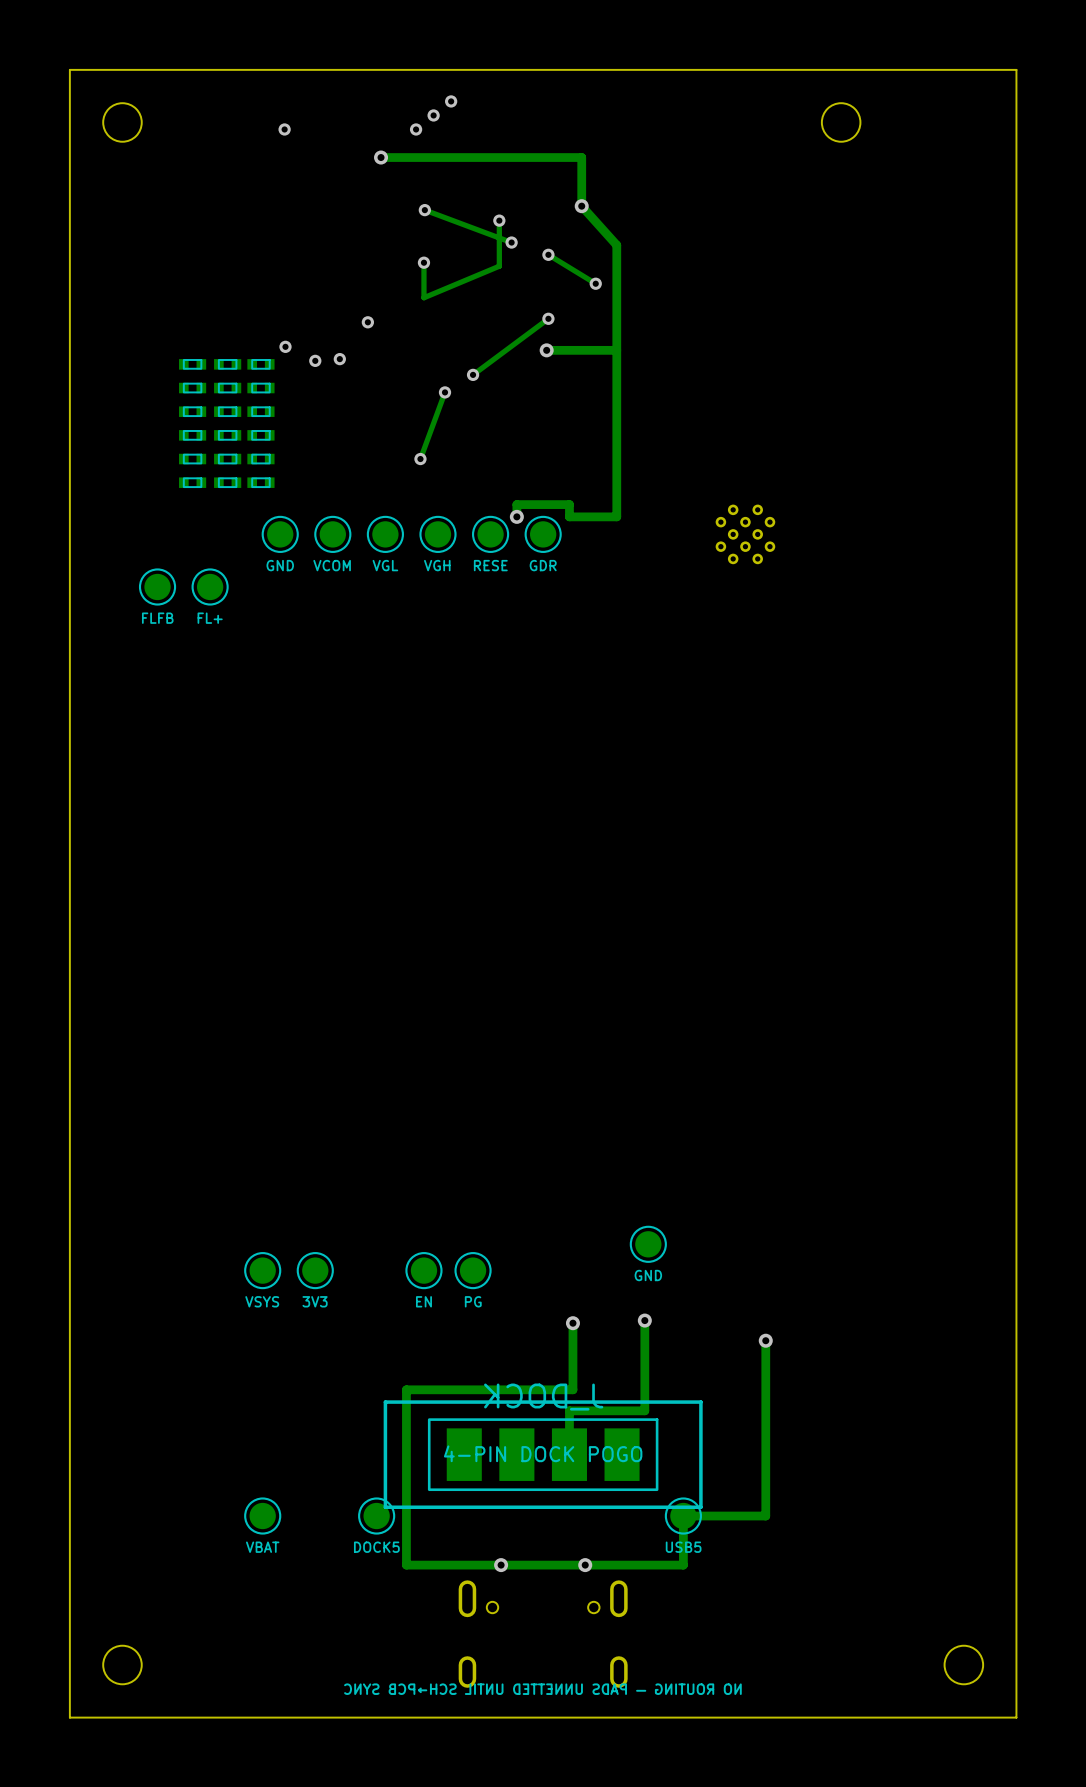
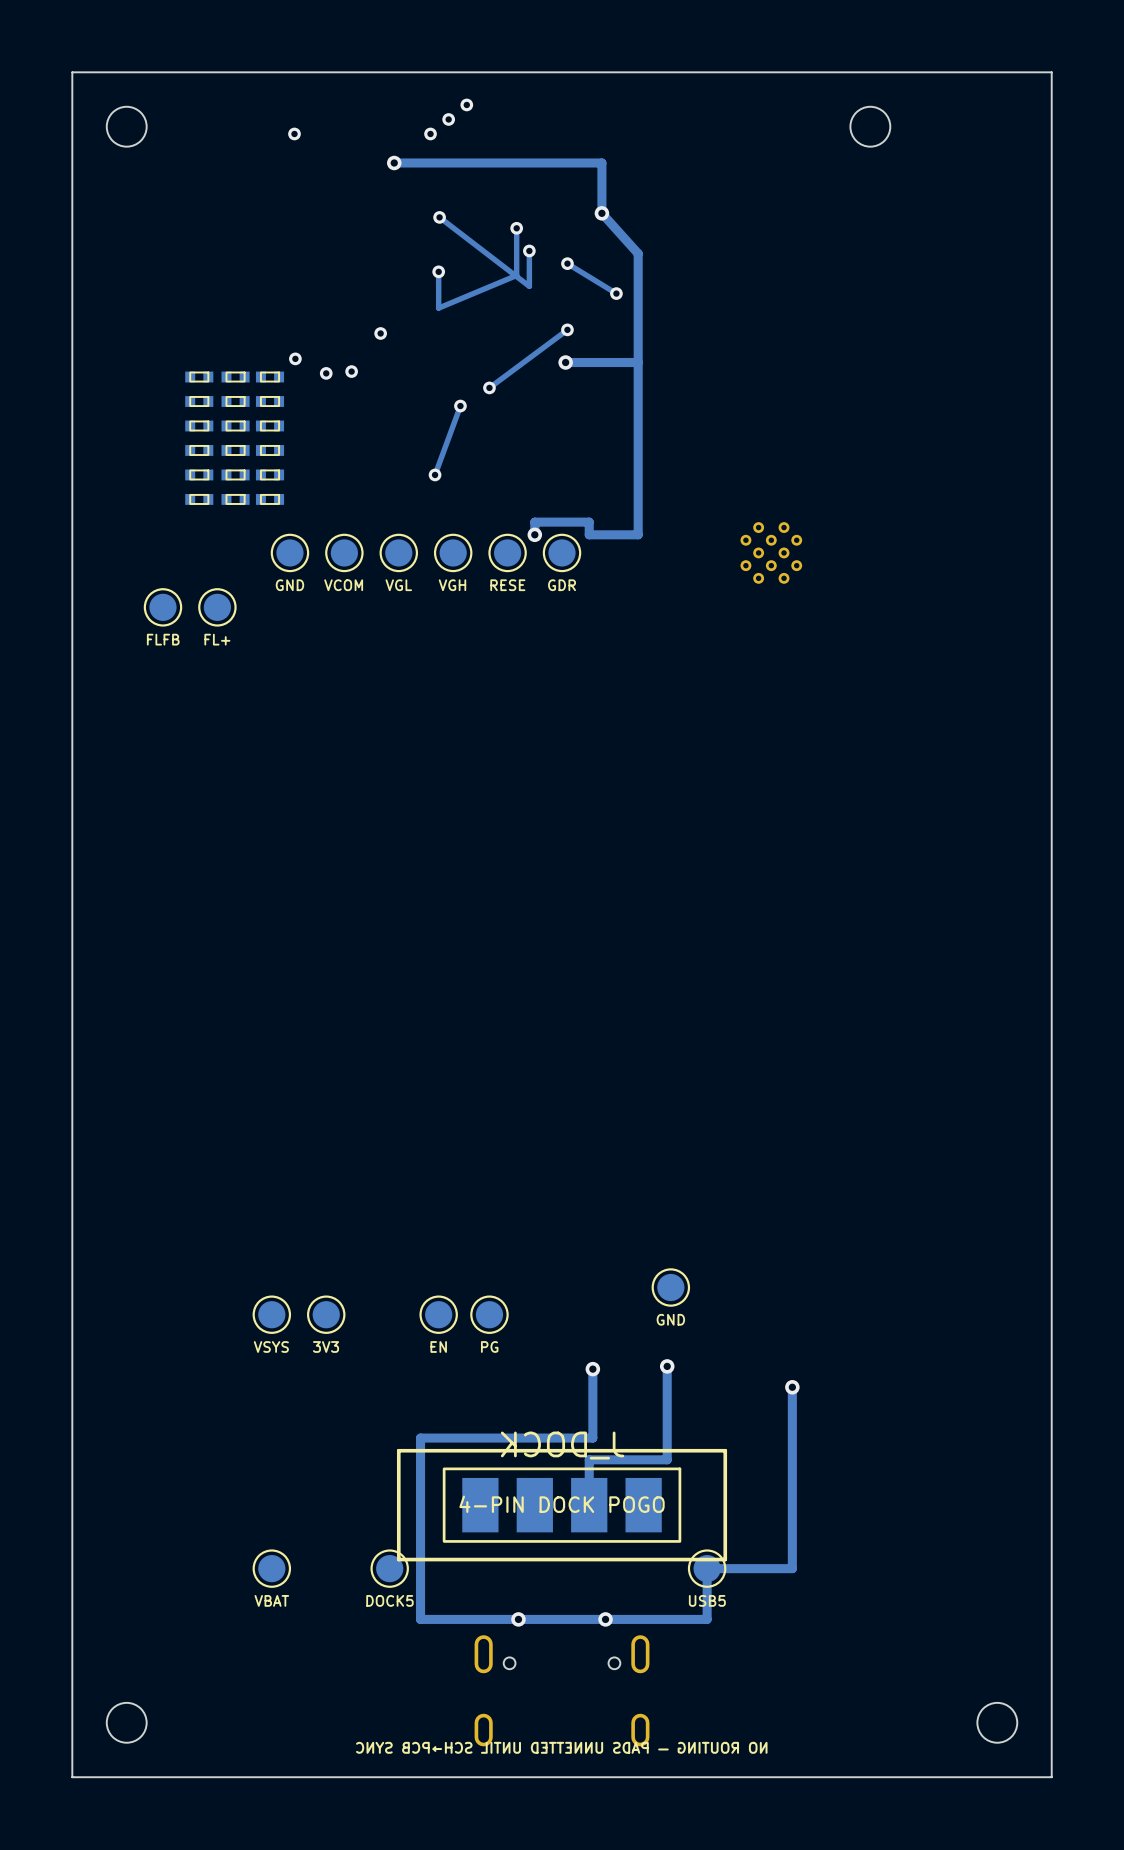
track: (424, 210) (511, 242) -> (439, 217) (529, 286) (529, 250)

